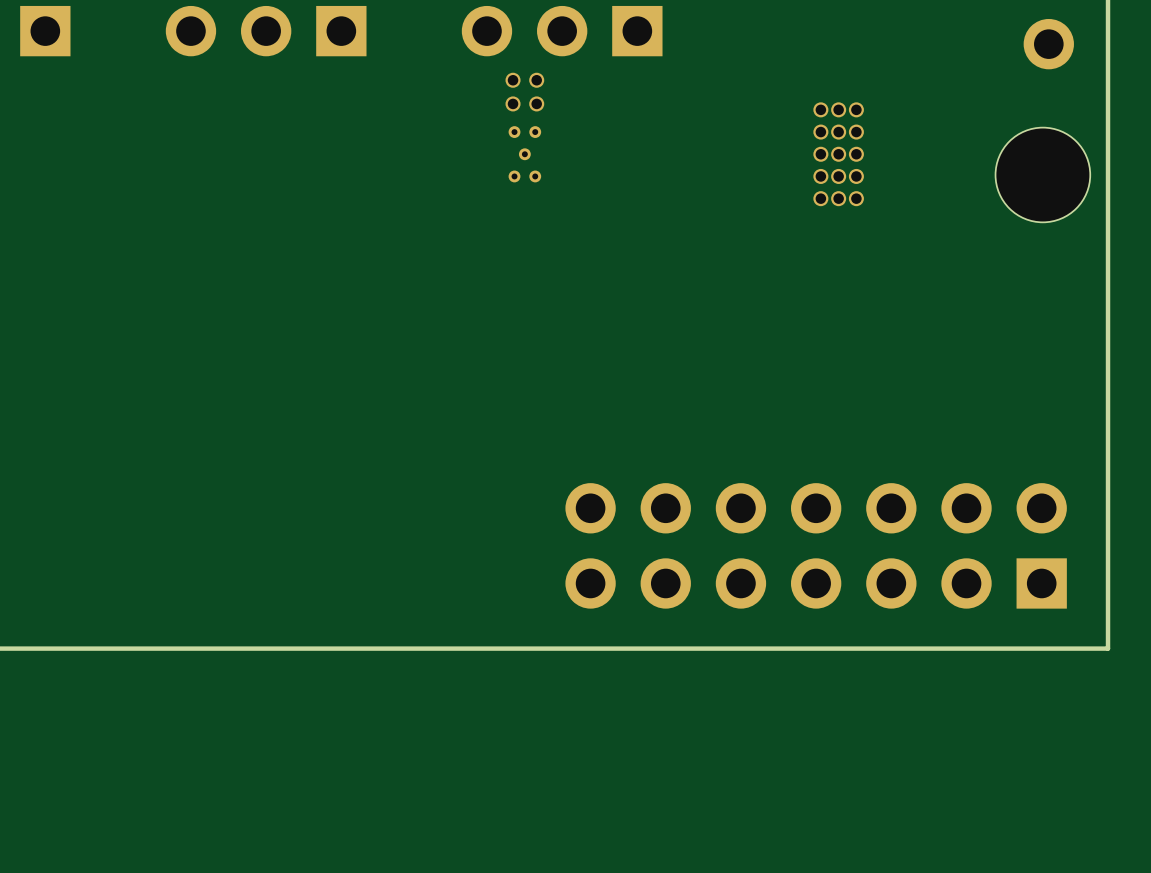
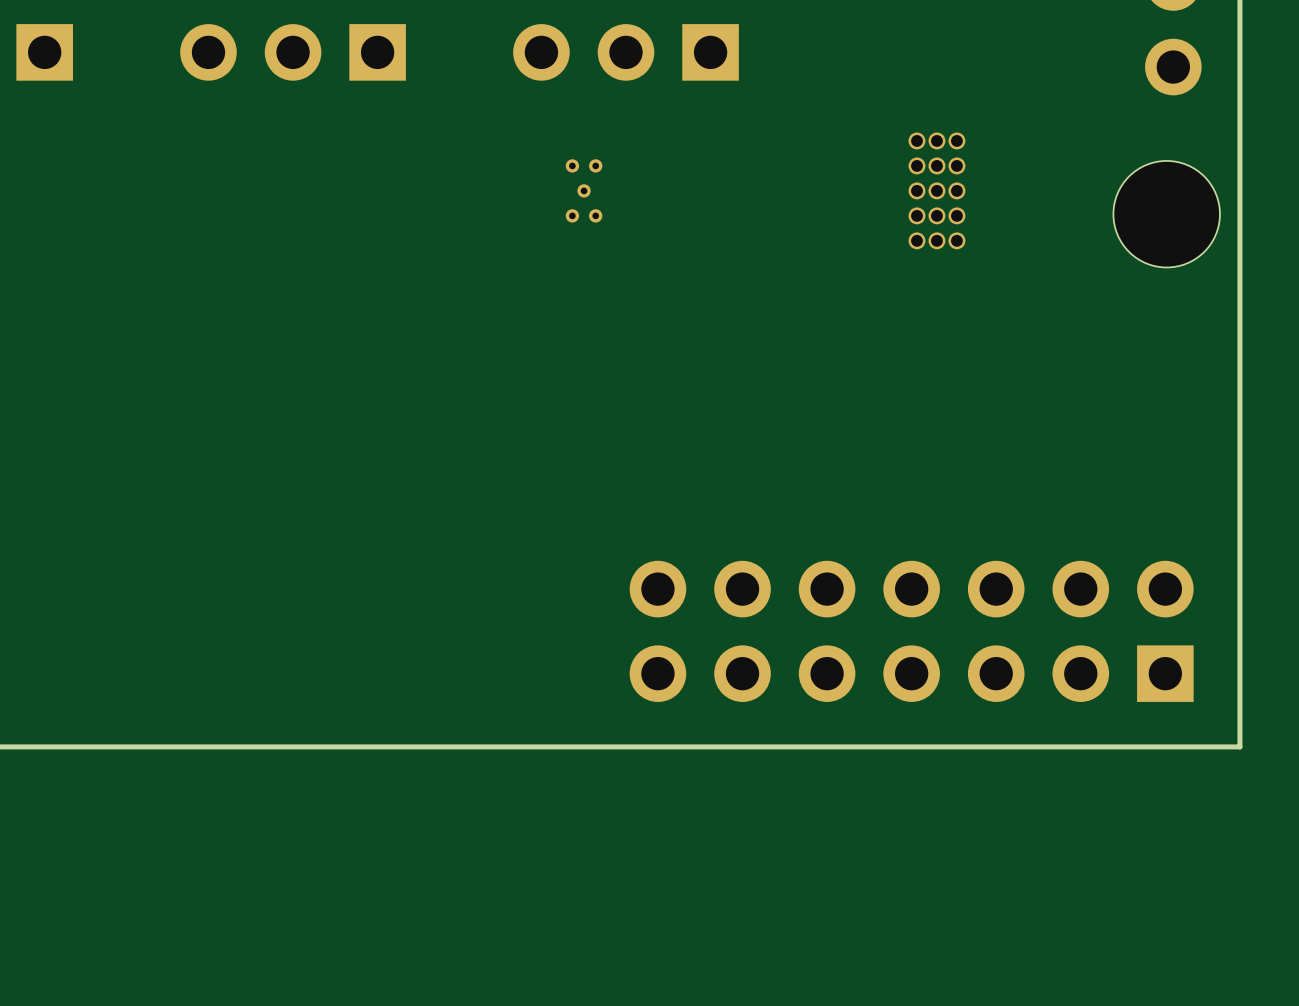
part: (513, 80) -> none
part: (536, 80) -> none
part: (513, 103) -> none
part: (536, 103) -> none

